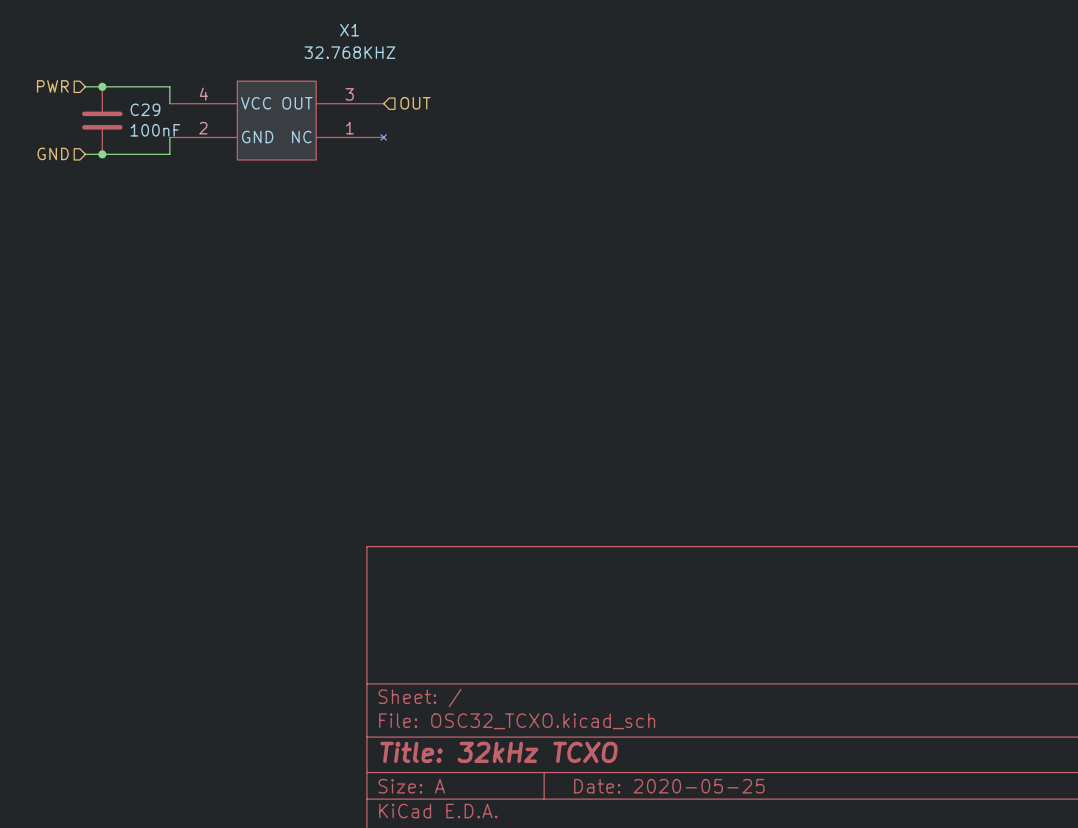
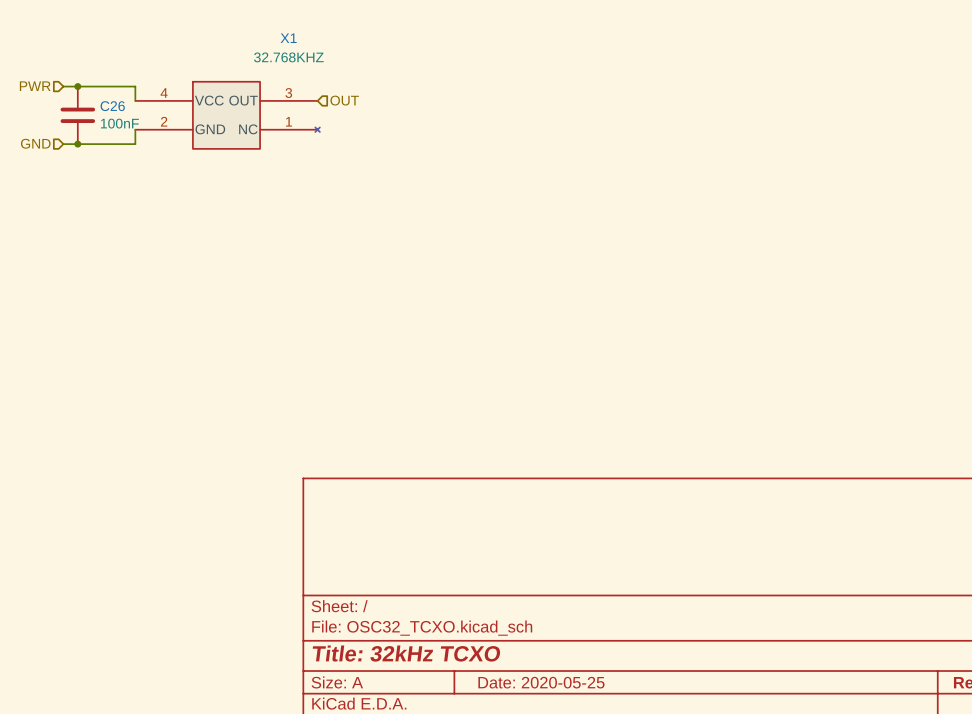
C29 name: C29 (145, 109) -> C26 (112, 106)

